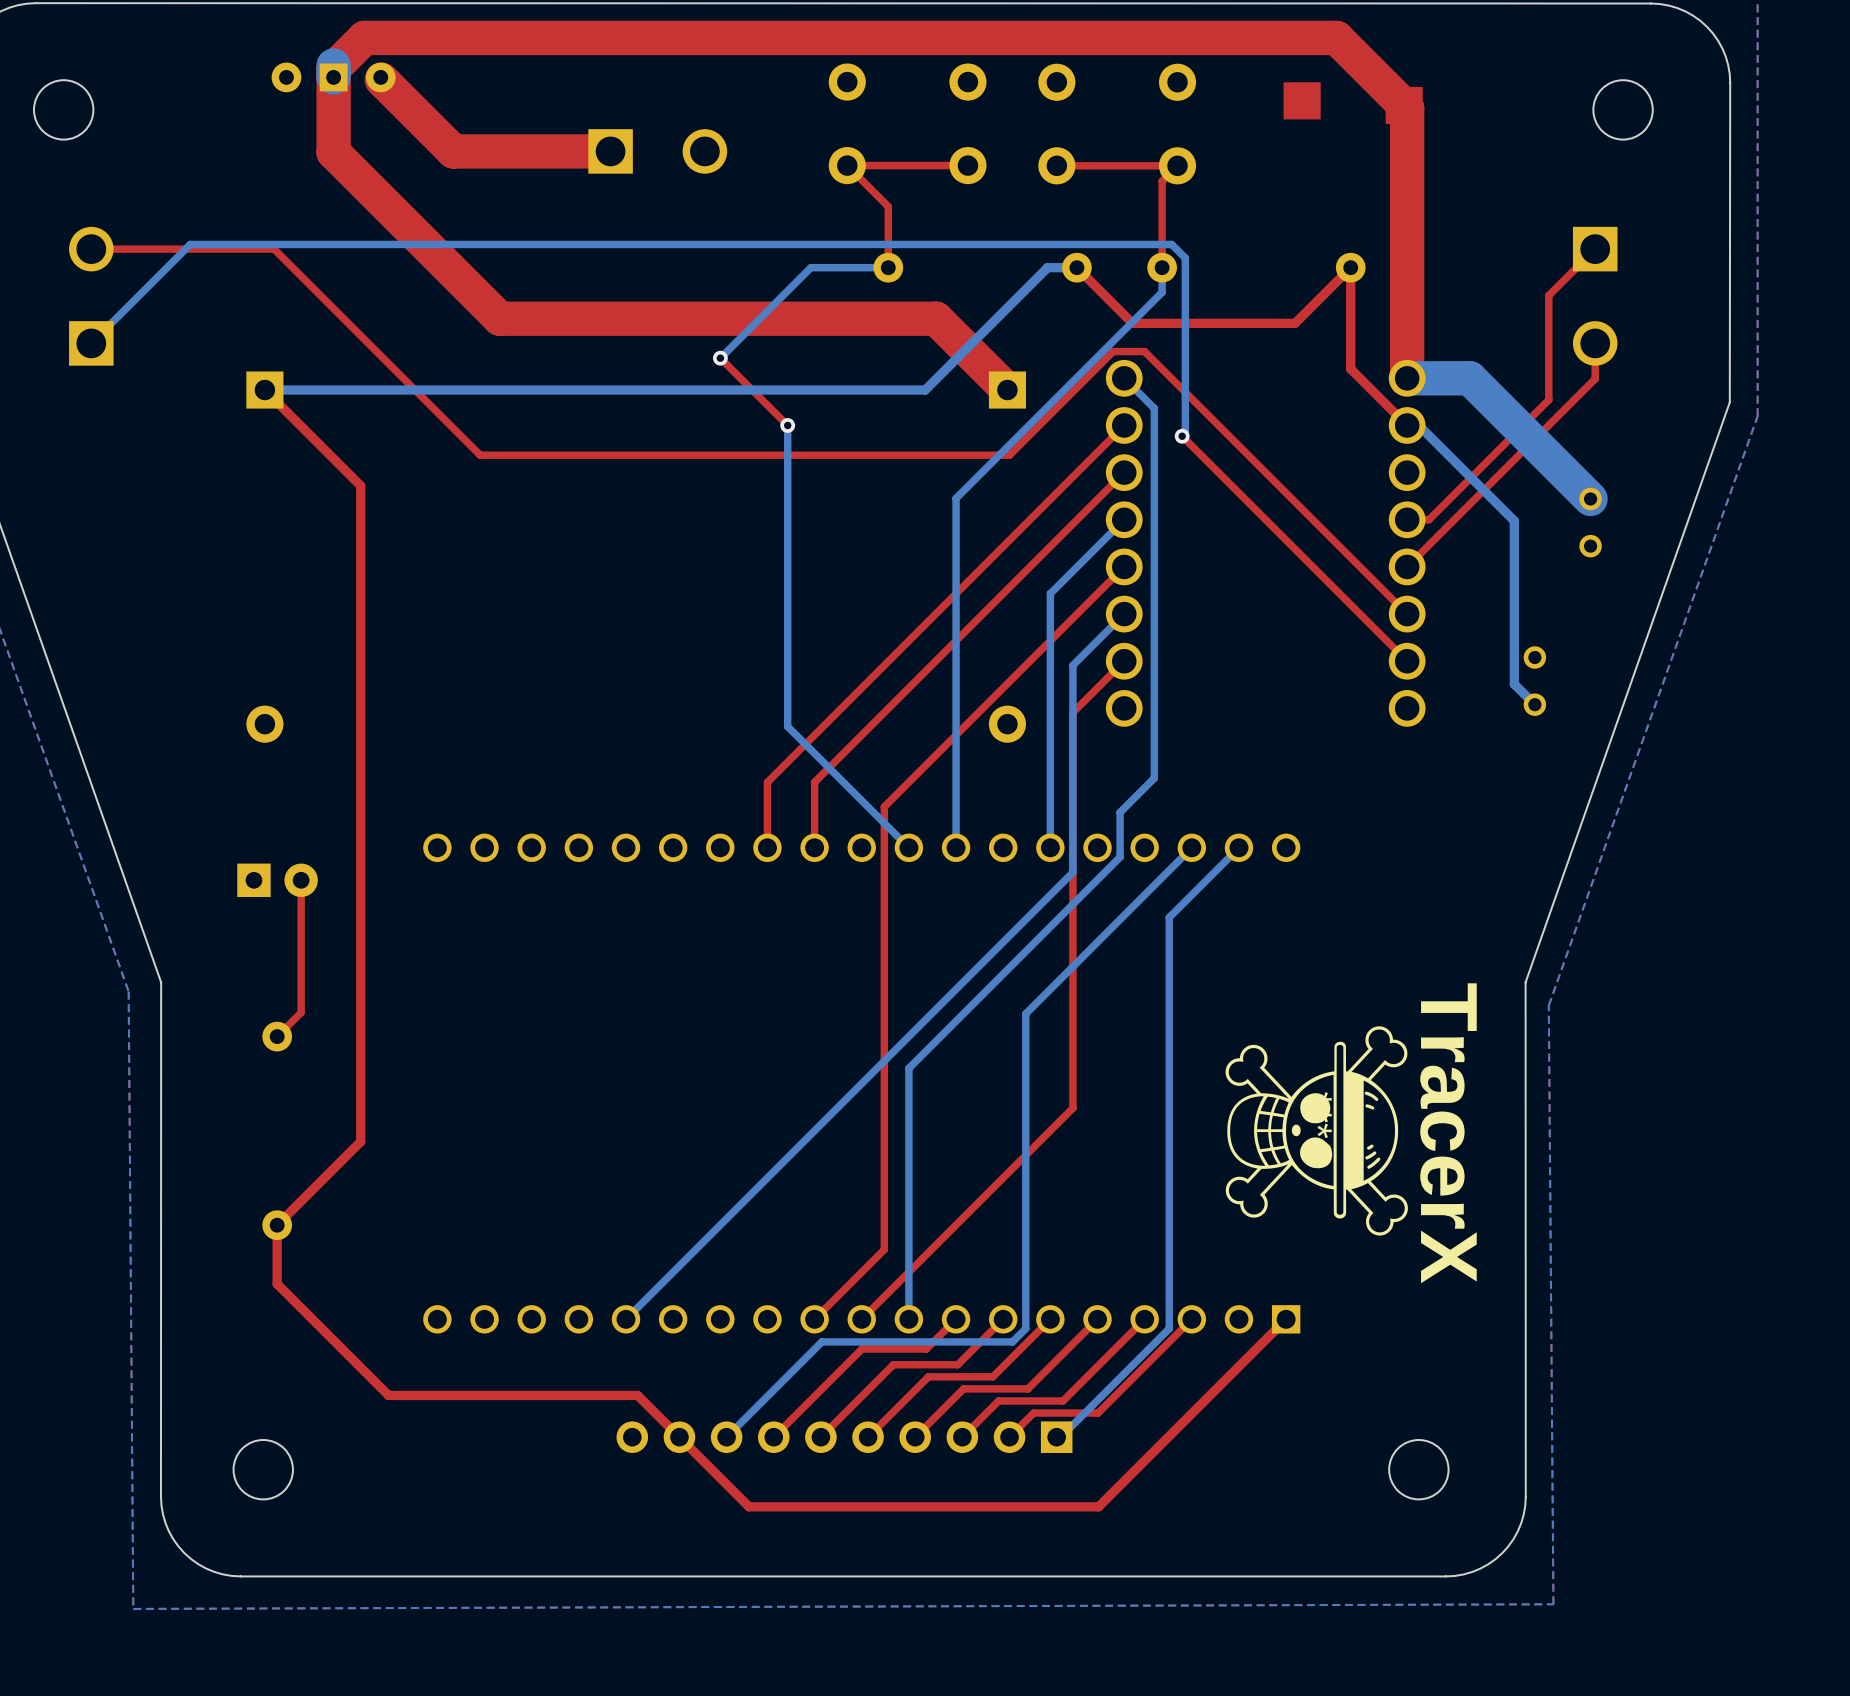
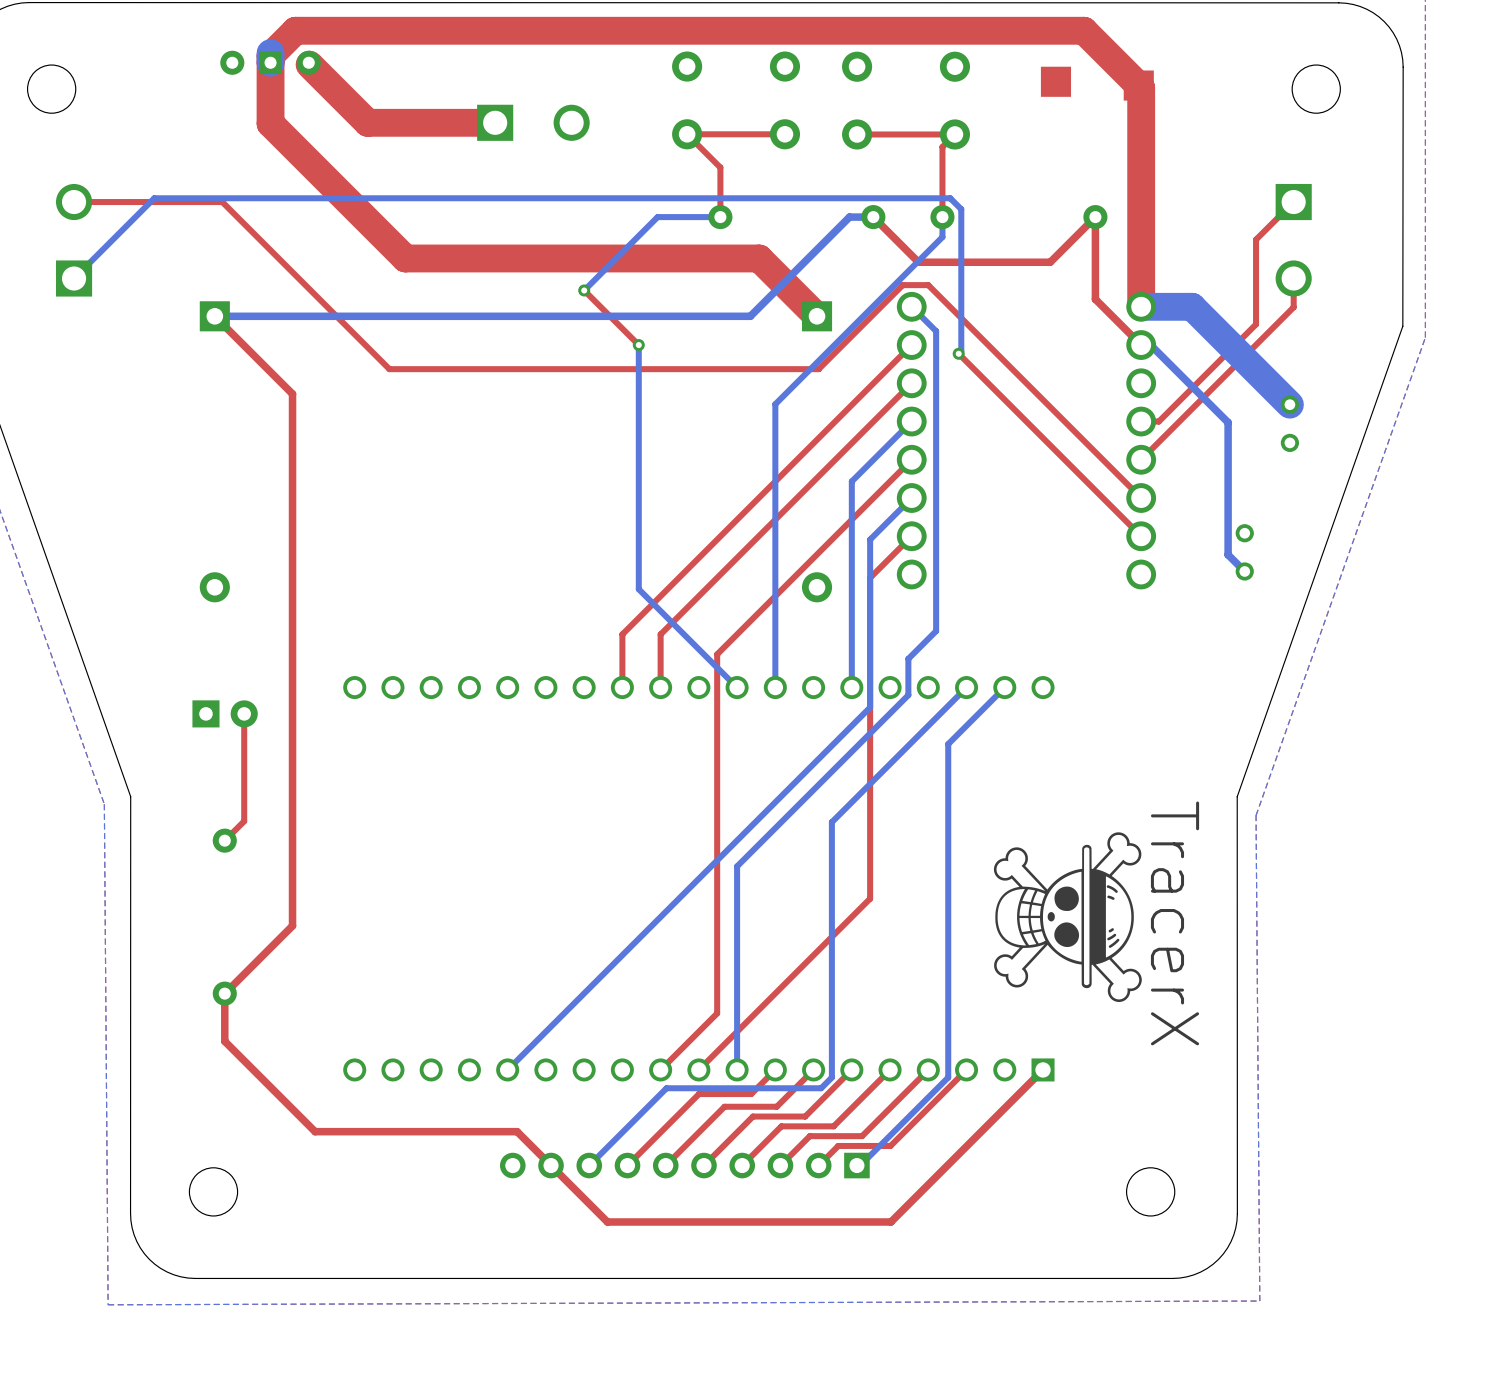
drawing: none -> [993, 832, 1142, 1003]
part: (1316, 1130) -> none

